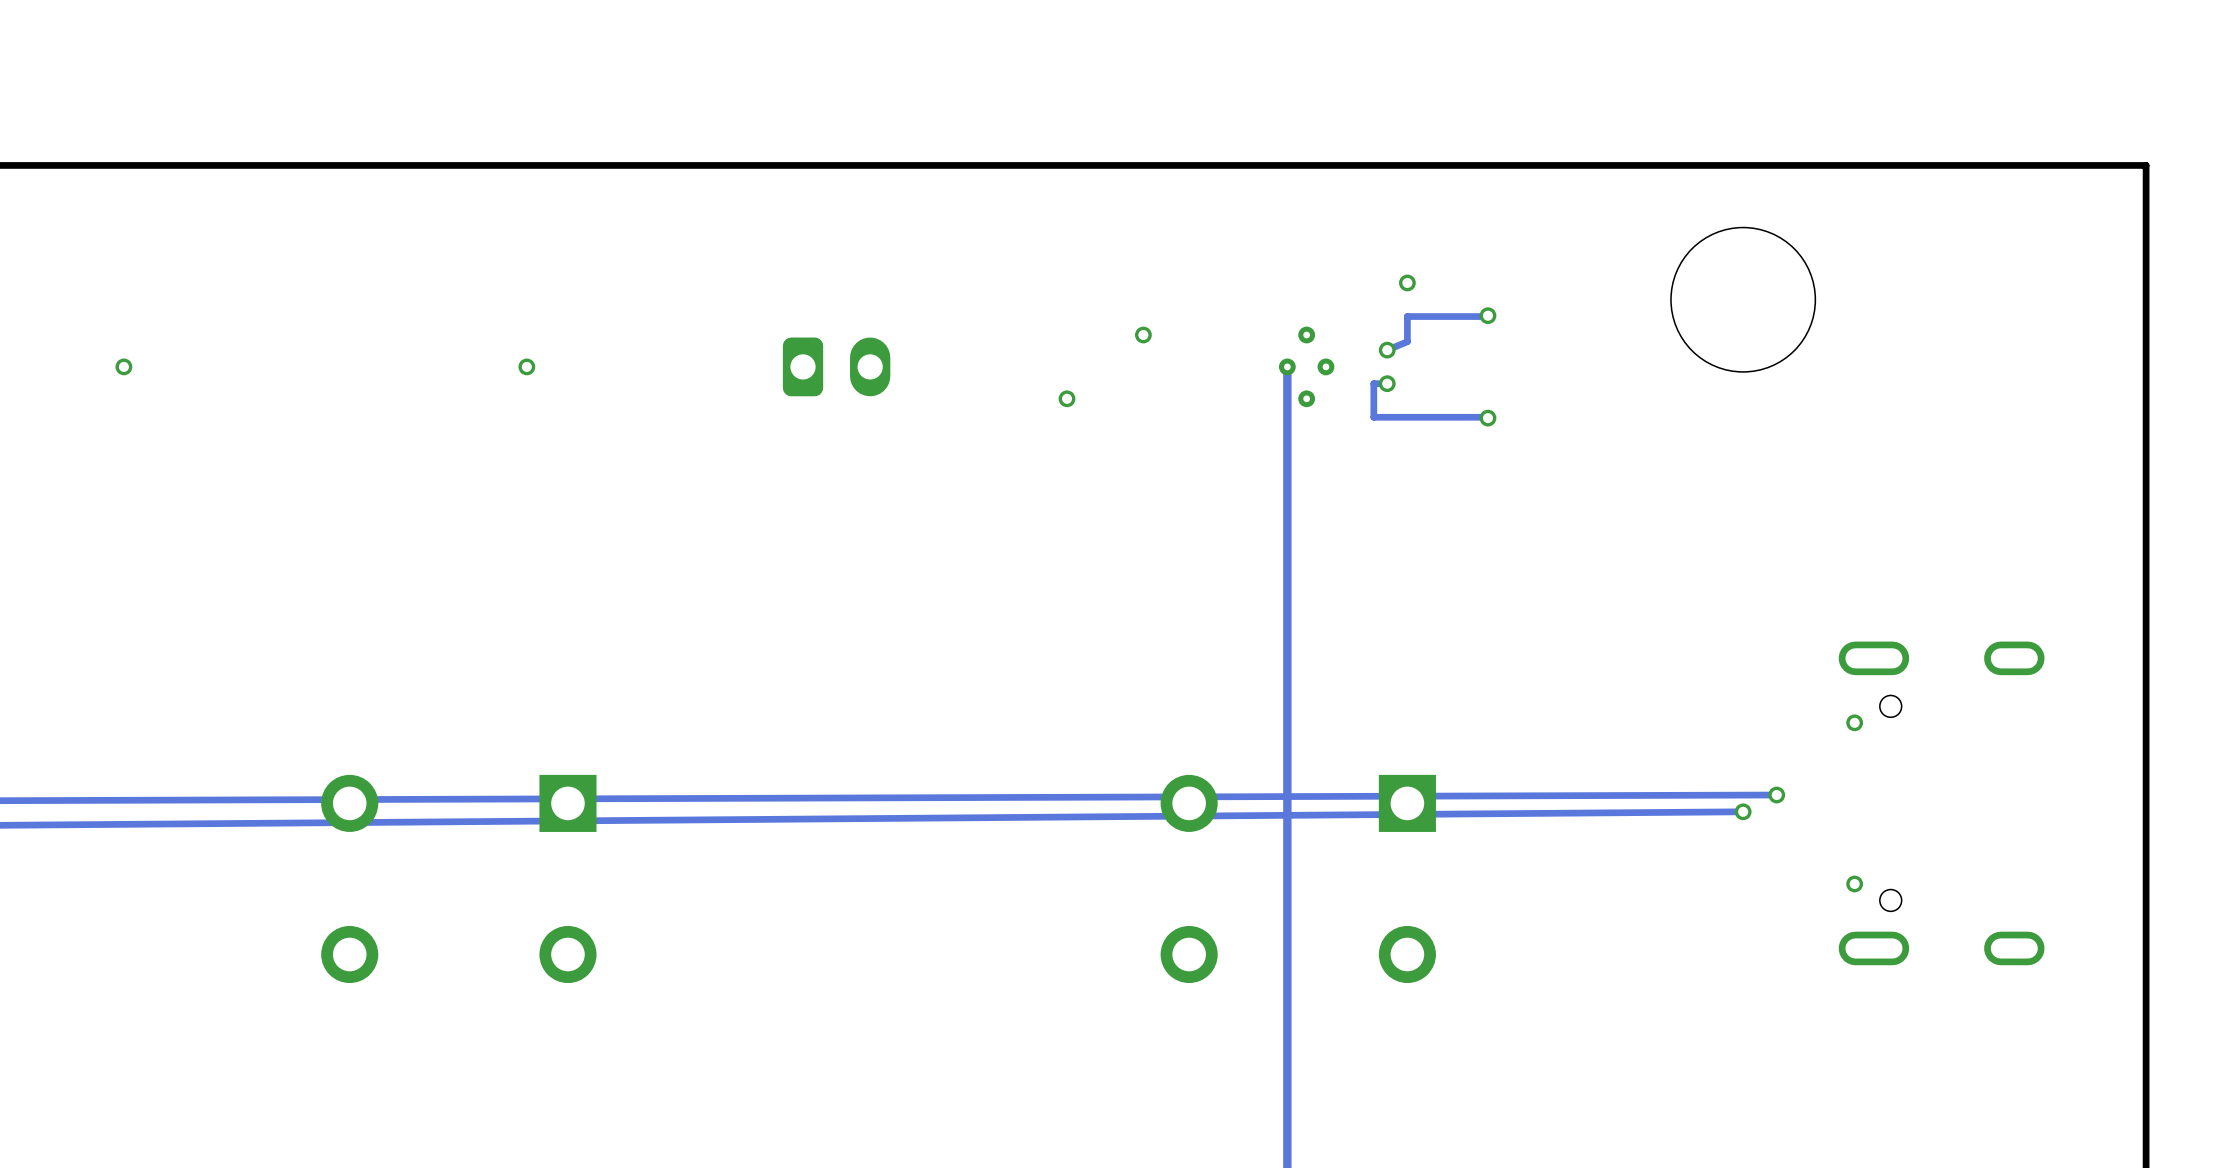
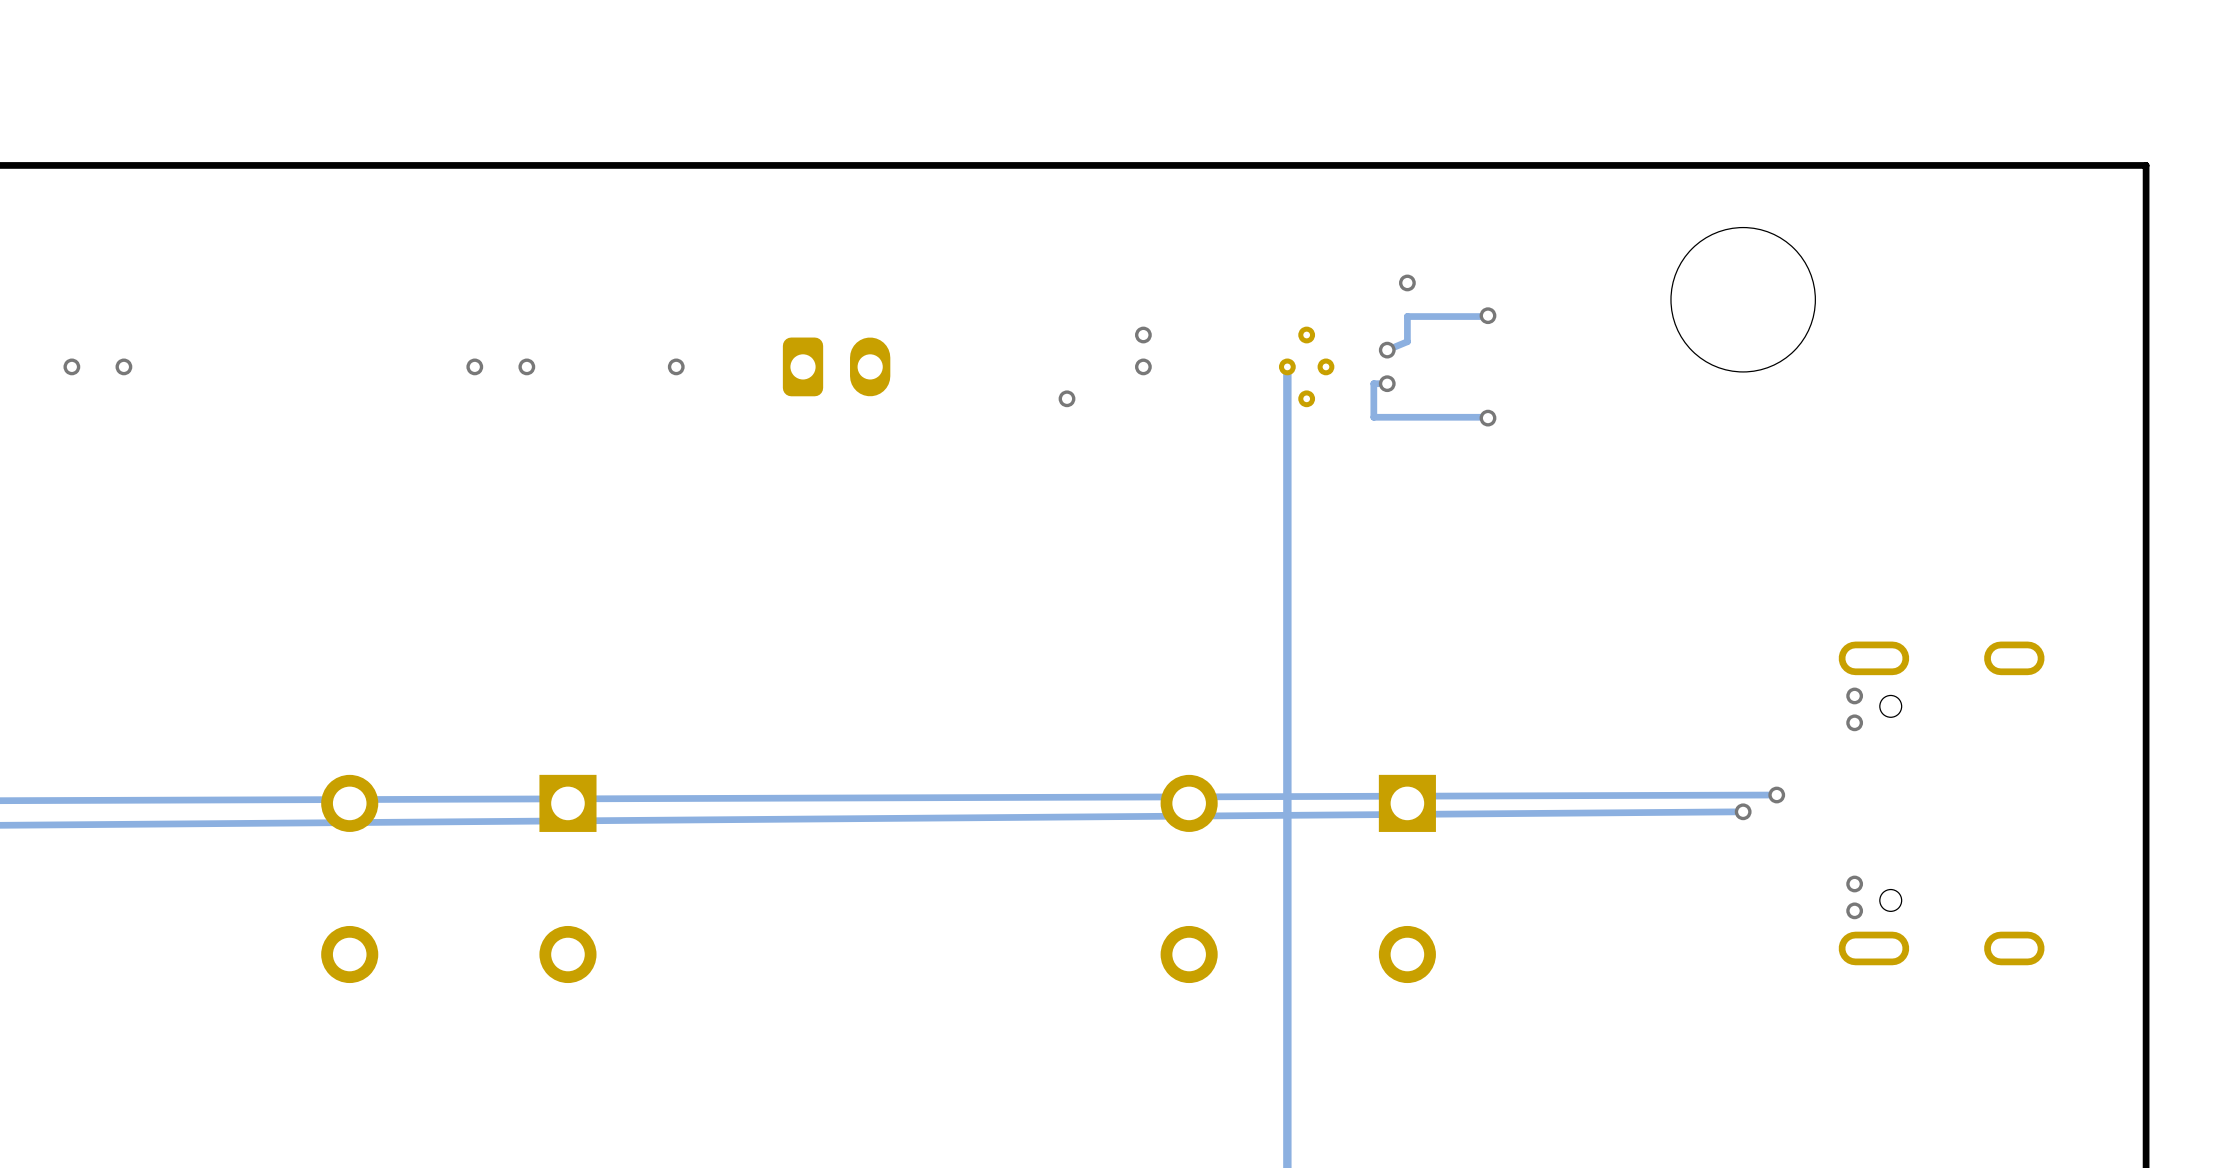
via: none -> (71, 366)
via: none -> (474, 366)
via: none -> (676, 366)
via: none -> (1143, 366)
via: none -> (1854, 695)
via: none -> (1854, 910)

